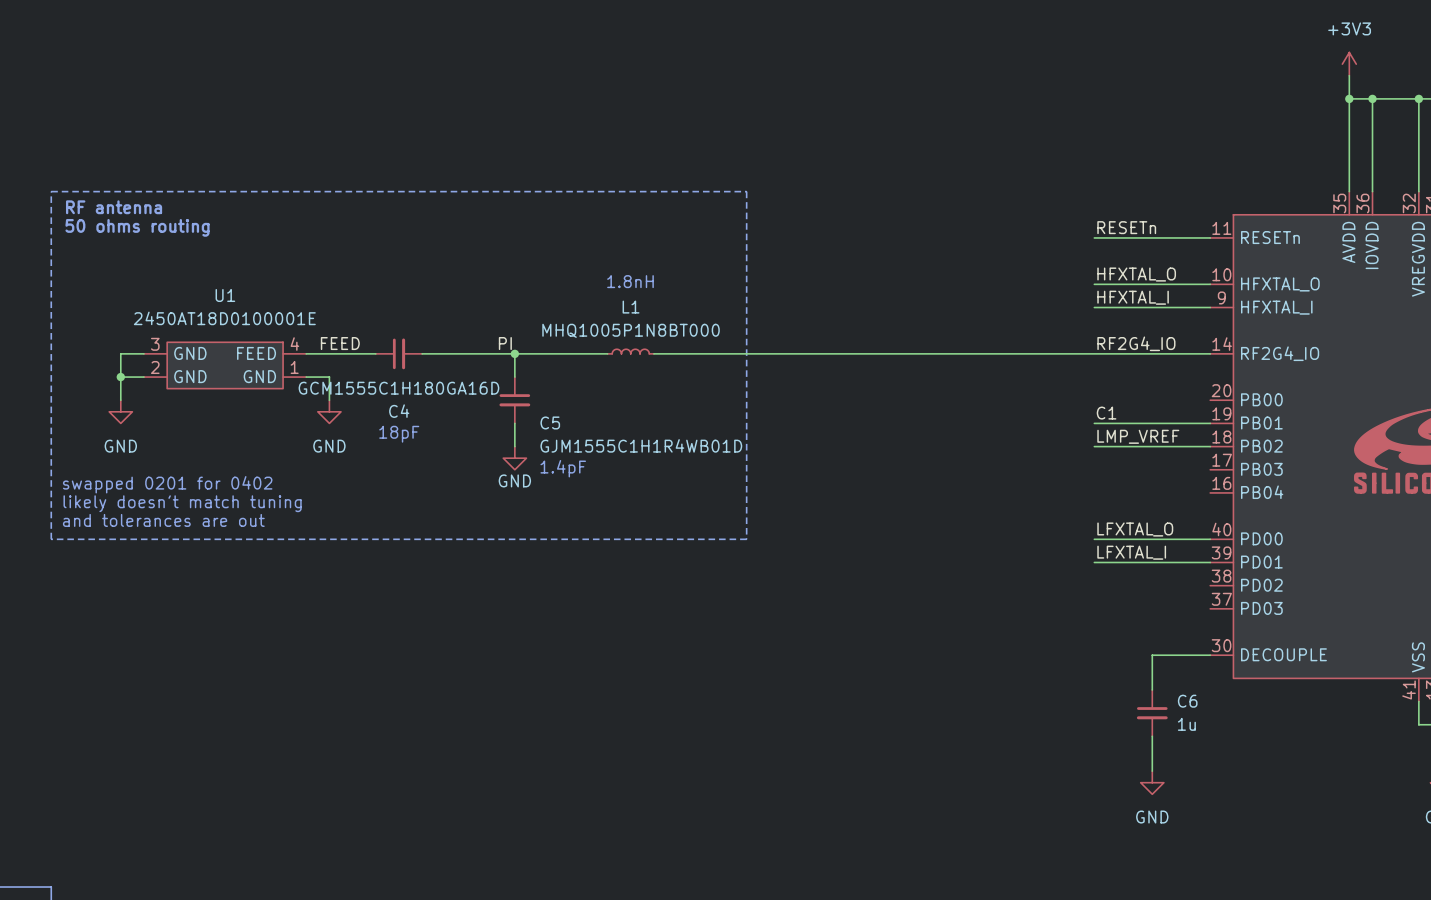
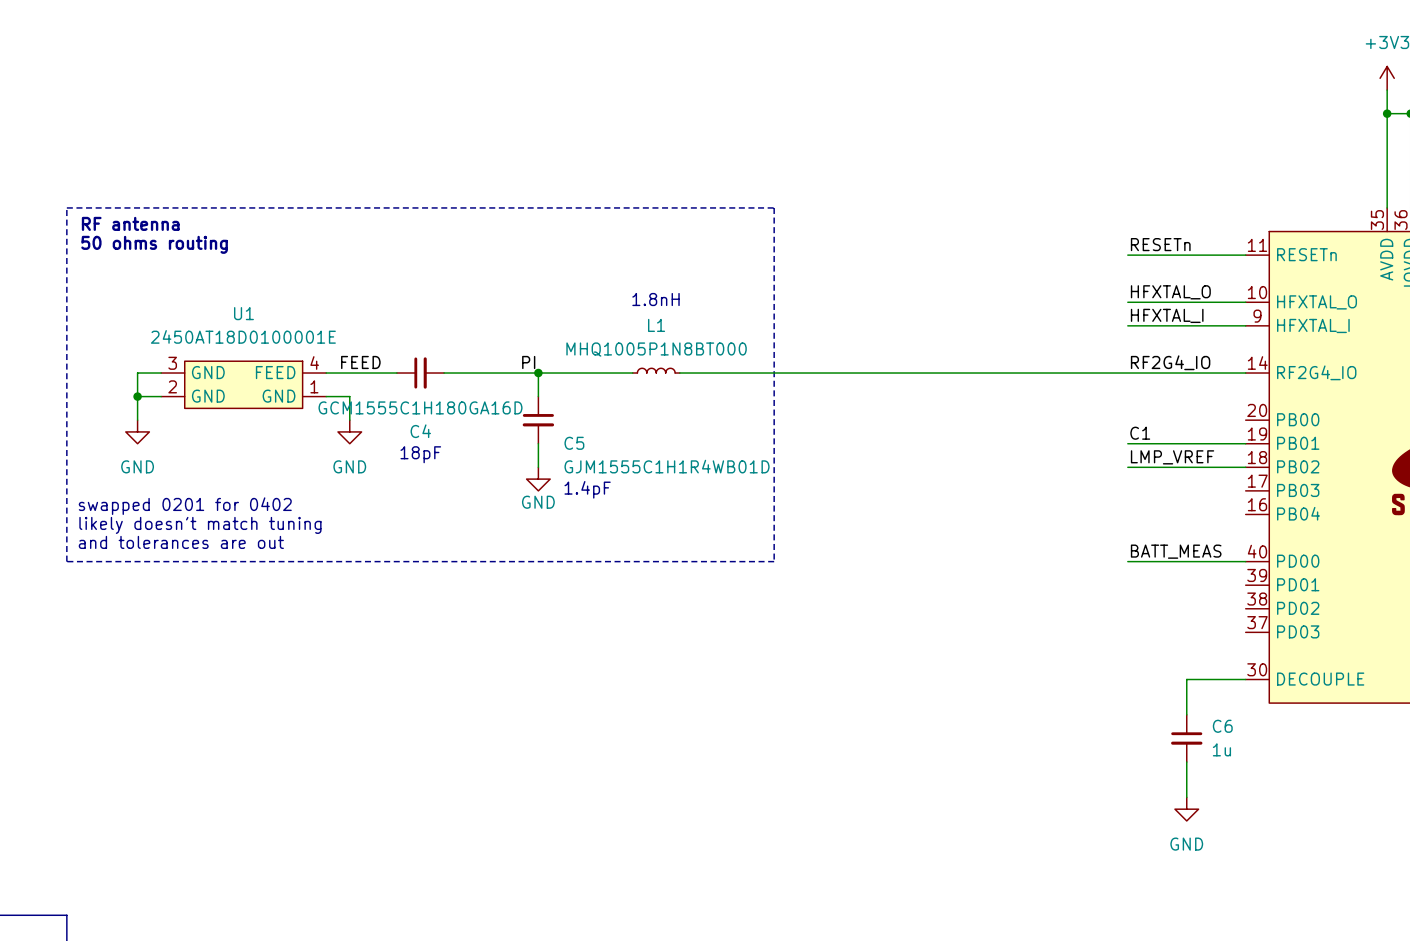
label: LFXTAL_O (1135, 529) -> BATT_MEAS (1176, 551)
label: LFXTAL_I (1131, 552) -> none
wire: (1094, 562) (1210, 562) -> none

